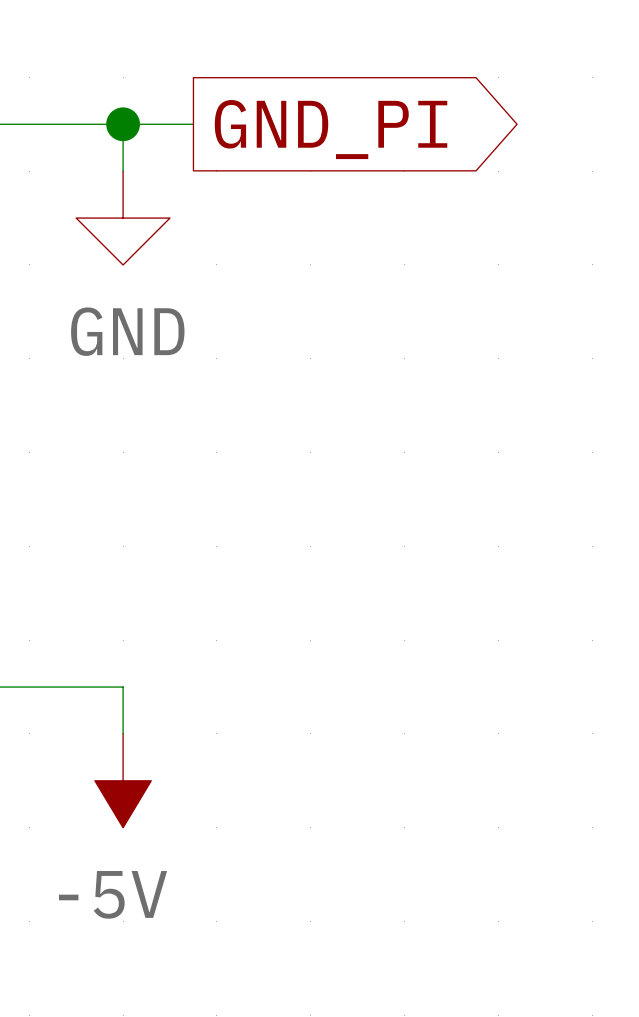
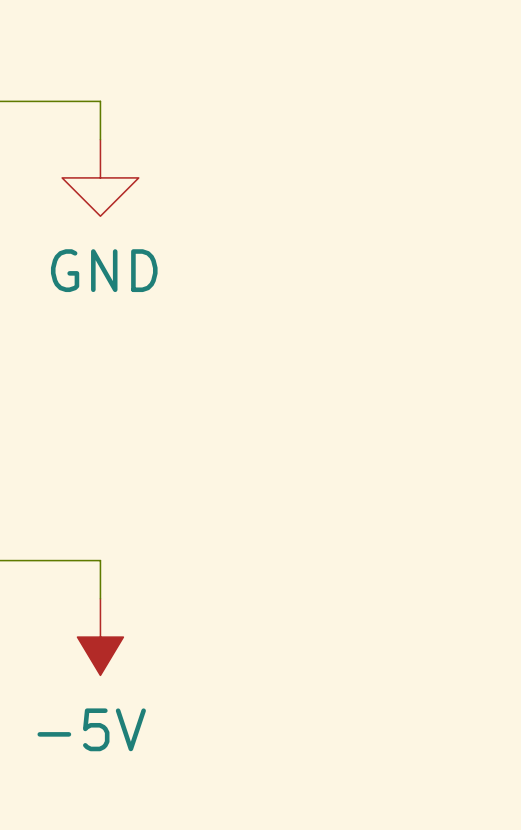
wire: (123, 124) (193, 124) -> none
junction: (123, 124) -> none
global label: GND_PI (331, 129) -> none

